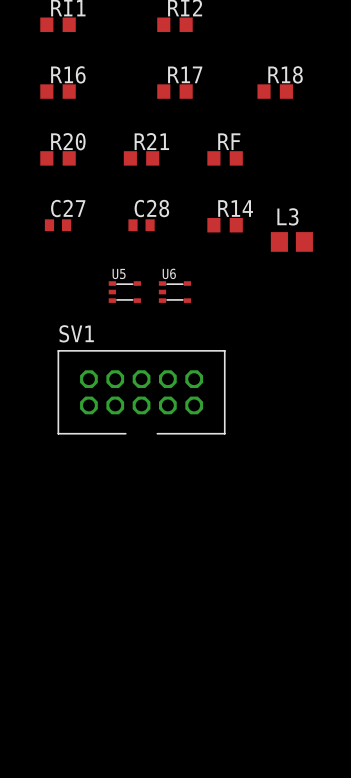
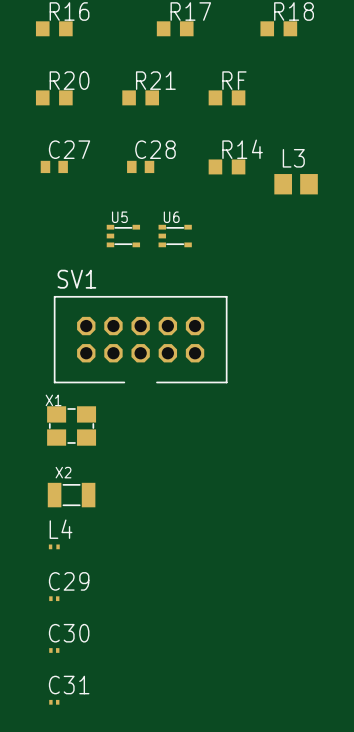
X1: none -> (71, 425)
X2: none -> (71, 495)
L4: none -> (54, 546)
C29: none -> (54, 598)
C30: none -> (54, 650)
C31: none -> (54, 702)

